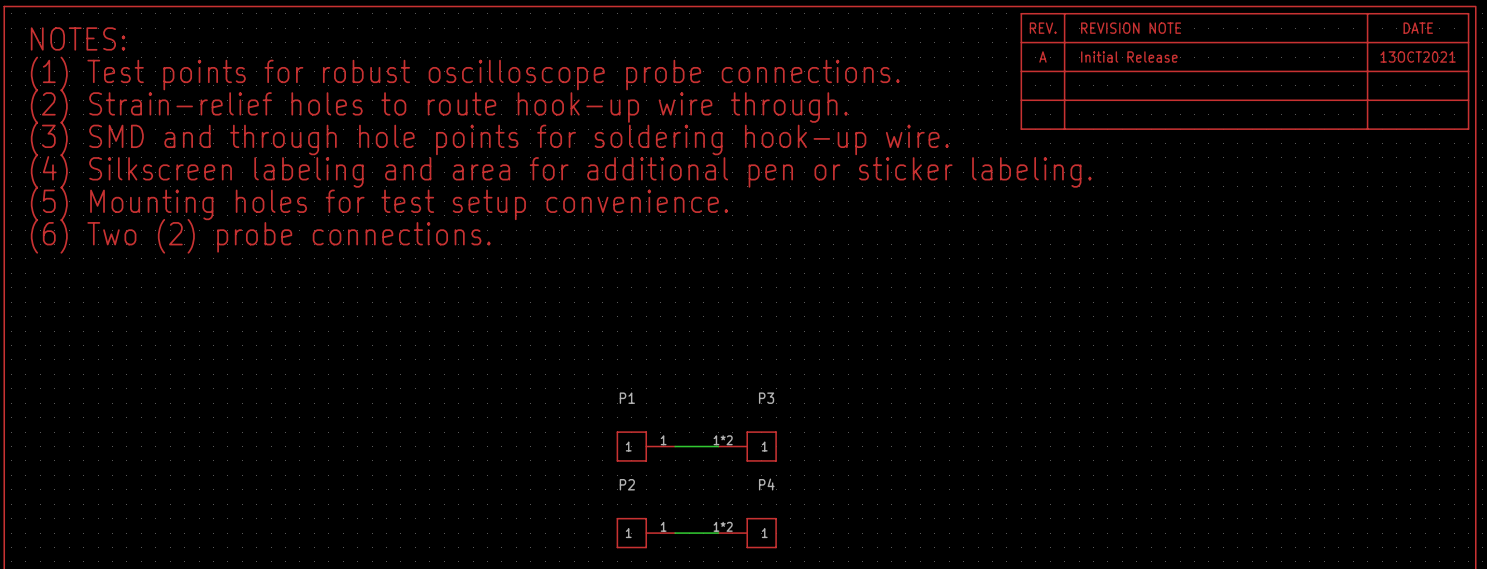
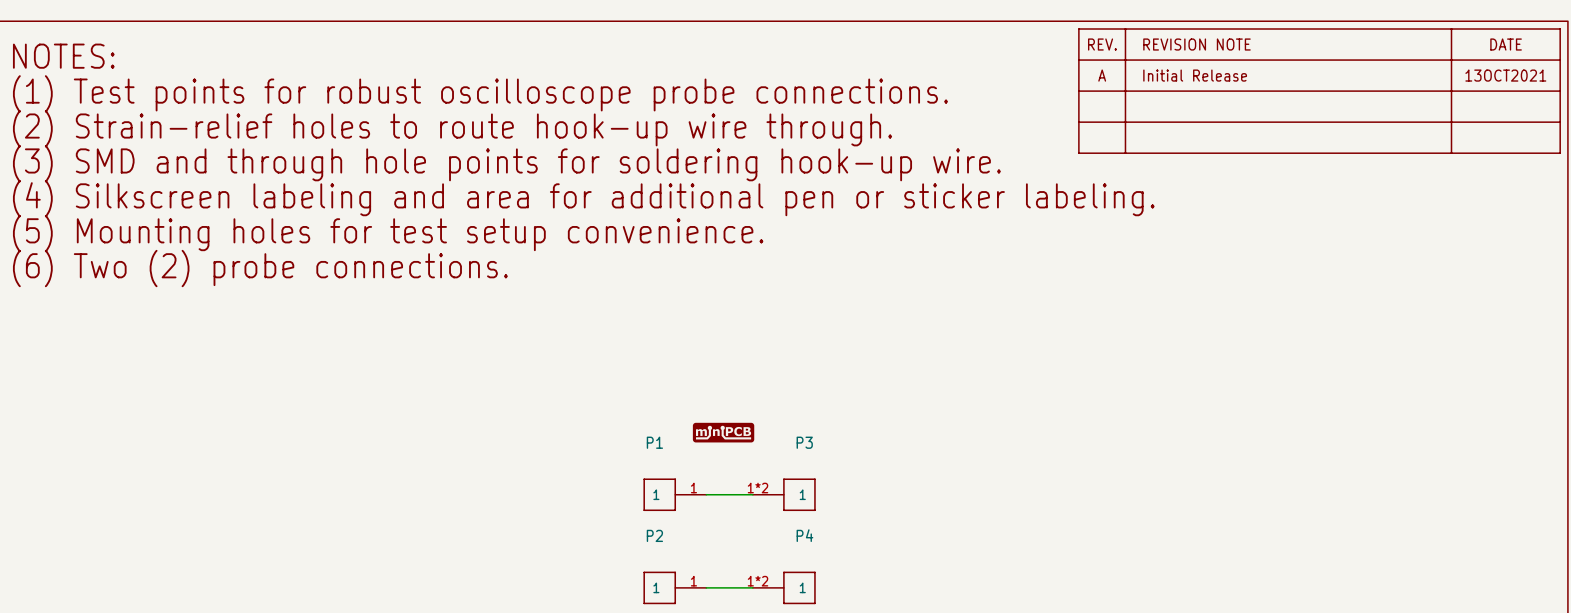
part: none -> (723, 432)

